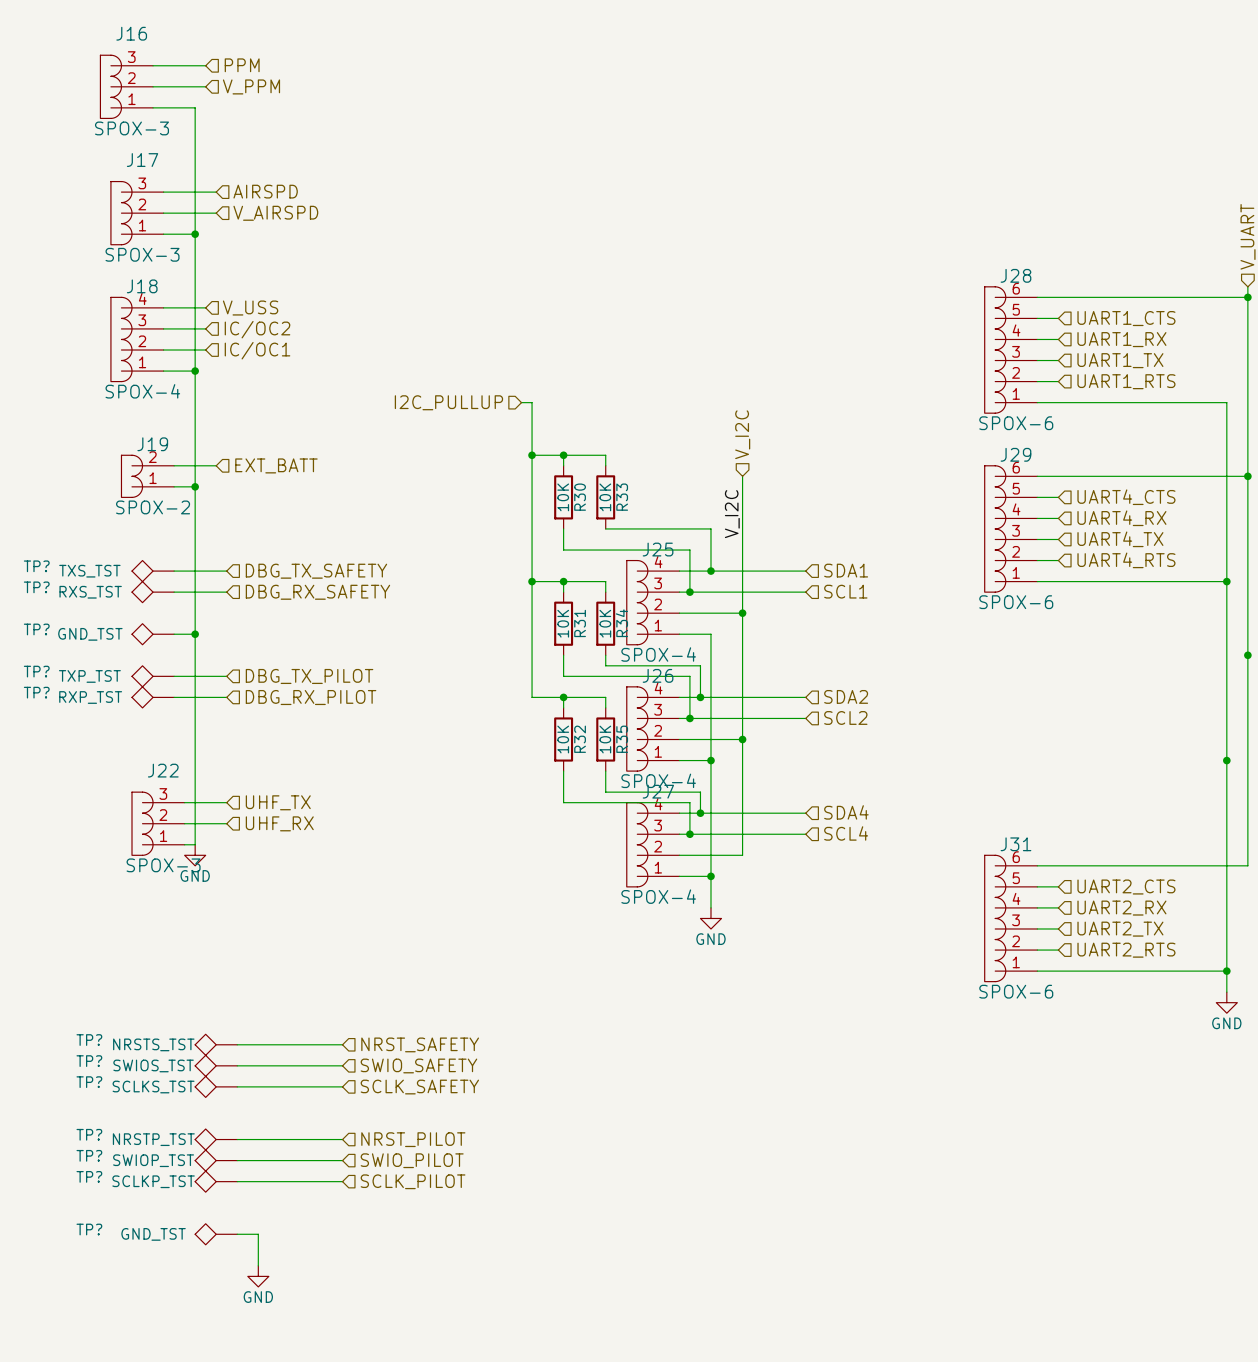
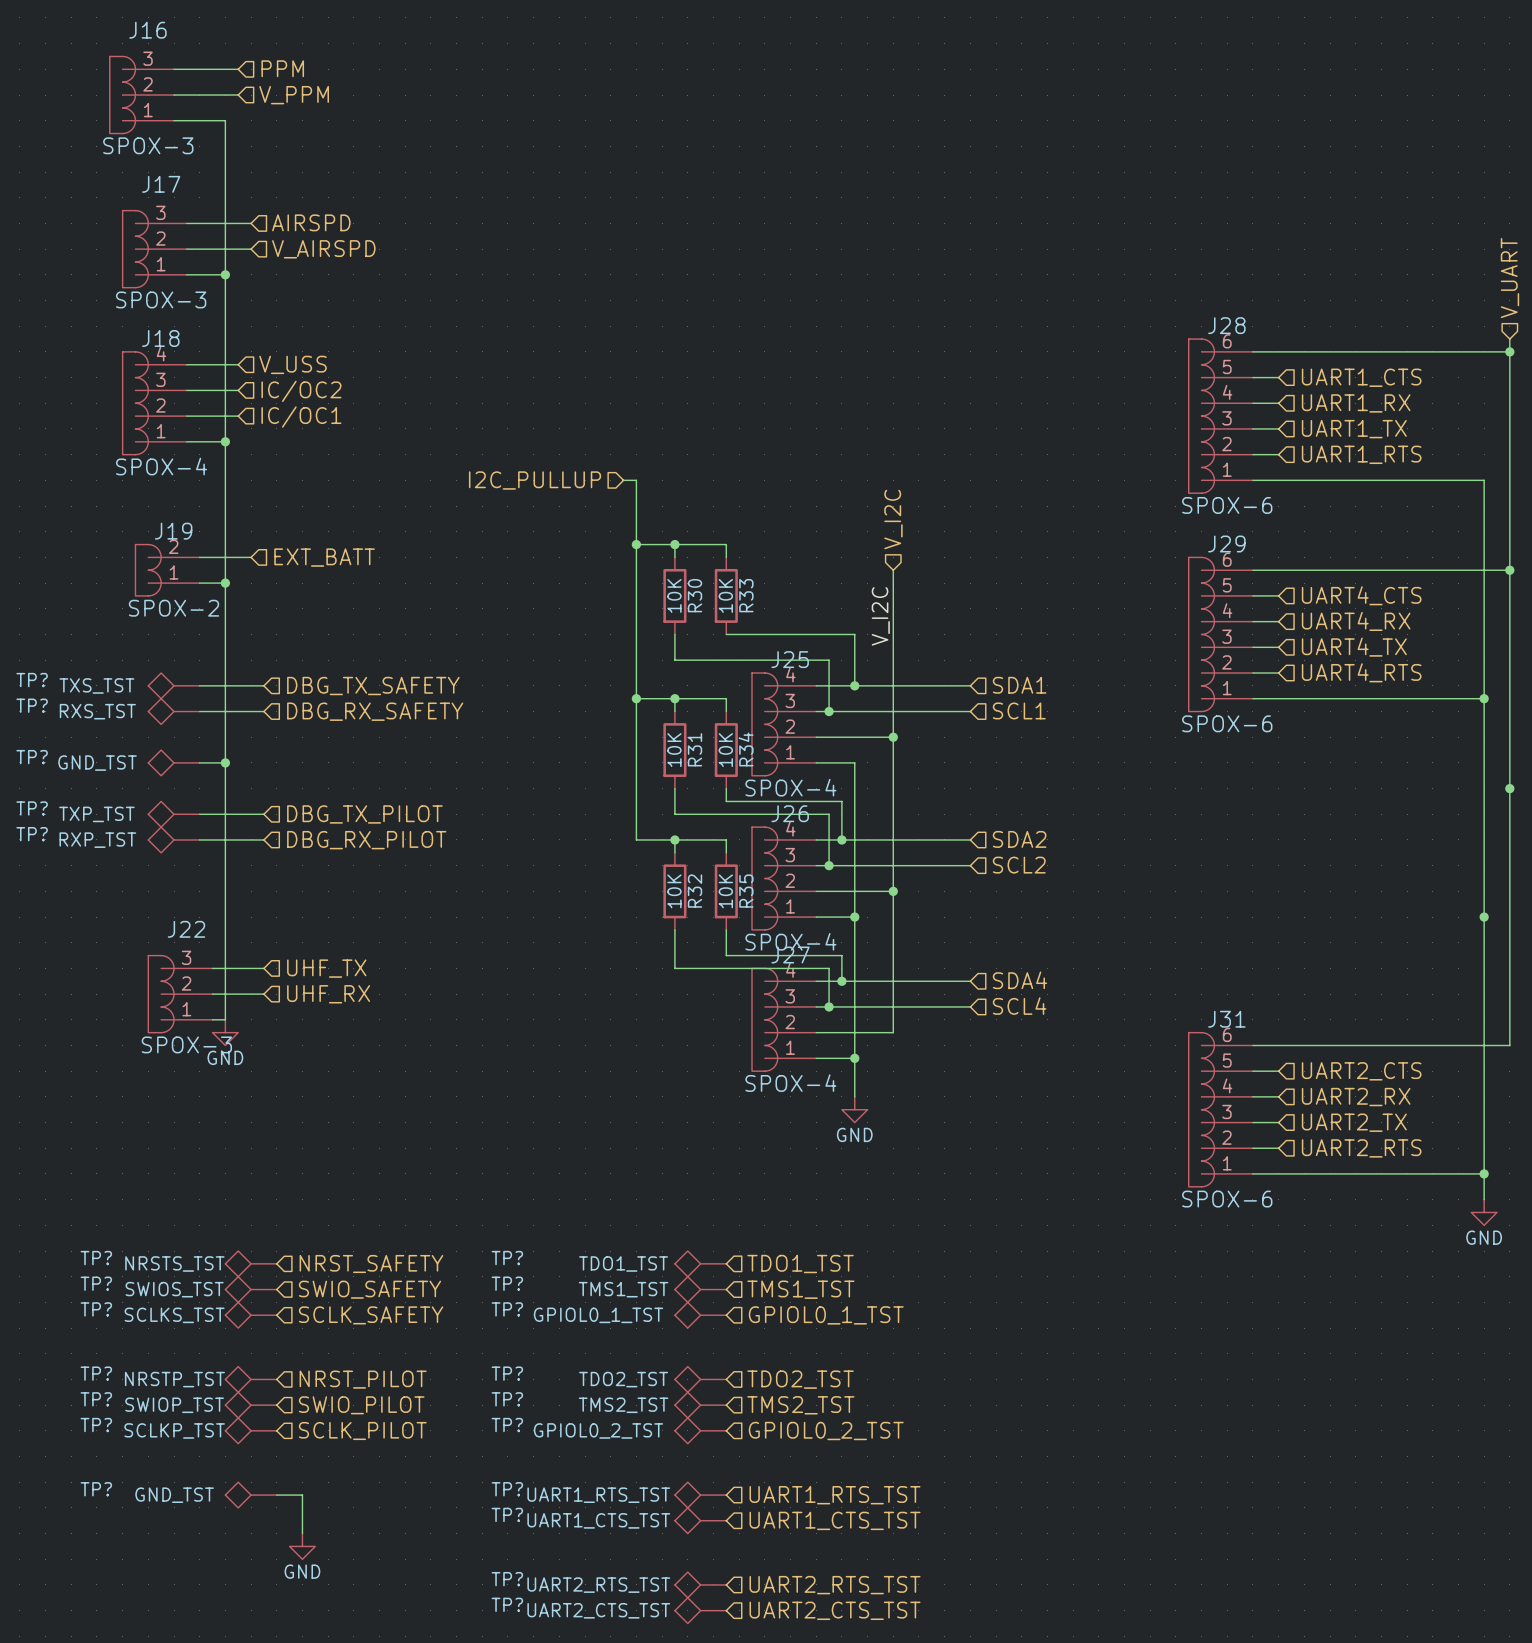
wire: (237, 1044) (342, 1044) -> none
hierarchical label position: NRST_SAFETY (420, 1044) -> NRST_SAFETY (371, 1264)
TP?: none -> TDO1_TST (700, 1263)
hierarchical label: none -> TDO1_TST (800, 1264)
wire: (237, 1065) (342, 1065) -> none
hierarchical label position: SWIO_SAFETY (418, 1065) -> SWIO_SAFETY (369, 1289)
TP?: none -> TMS1_TST (700, 1289)
hierarchical label: none -> TMS1_TST (800, 1289)
wire: (237, 1086) (342, 1086) -> none
TP?: none -> GPIOL0_1_TST (700, 1315)
hierarchical label position: SCLK_SAFETY (419, 1087) -> SCLK_SAFETY (371, 1315)
hierarchical label: none -> GPIOL0_1_TST (826, 1315)
wire: (237, 1139) (342, 1139) -> none
hierarchical label position: NRST_PILOT (413, 1139) -> NRST_PILOT (363, 1379)
TP?: none -> TDO2_TST (700, 1379)
hierarchical label: none -> TDO2_TST (800, 1379)
wire: (237, 1160) (342, 1160) -> none
hierarchical label position: SWIO_PILOT (412, 1160) -> SWIO_PILOT (361, 1405)
TP?: none -> TMS2_TST (700, 1405)
hierarchical label: none -> TMS2_TST (800, 1405)
wire: (237, 1181) (342, 1181) -> none
hierarchical label position: SCLK_PILOT (413, 1181) -> SCLK_PILOT (362, 1430)
TP?: none -> GPIOL0_2_TST (700, 1430)
hierarchical label: none -> GPIOL0_2_TST (826, 1430)
TP?: none -> UART1_RTS_TST (700, 1495)
hierarchical label: none -> UART1_RTS_TST (835, 1495)
TP?: none -> UART1_CTS_TST (700, 1520)
hierarchical label: none -> UART1_CTS_TST (835, 1520)
TP?: none -> UART2_RTS_TST (700, 1584)
hierarchical label: none -> UART2_RTS_TST (835, 1585)
TP?: none -> UART2_CTS_TST (700, 1610)
hierarchical label: none -> UART2_CTS_TST (835, 1610)

